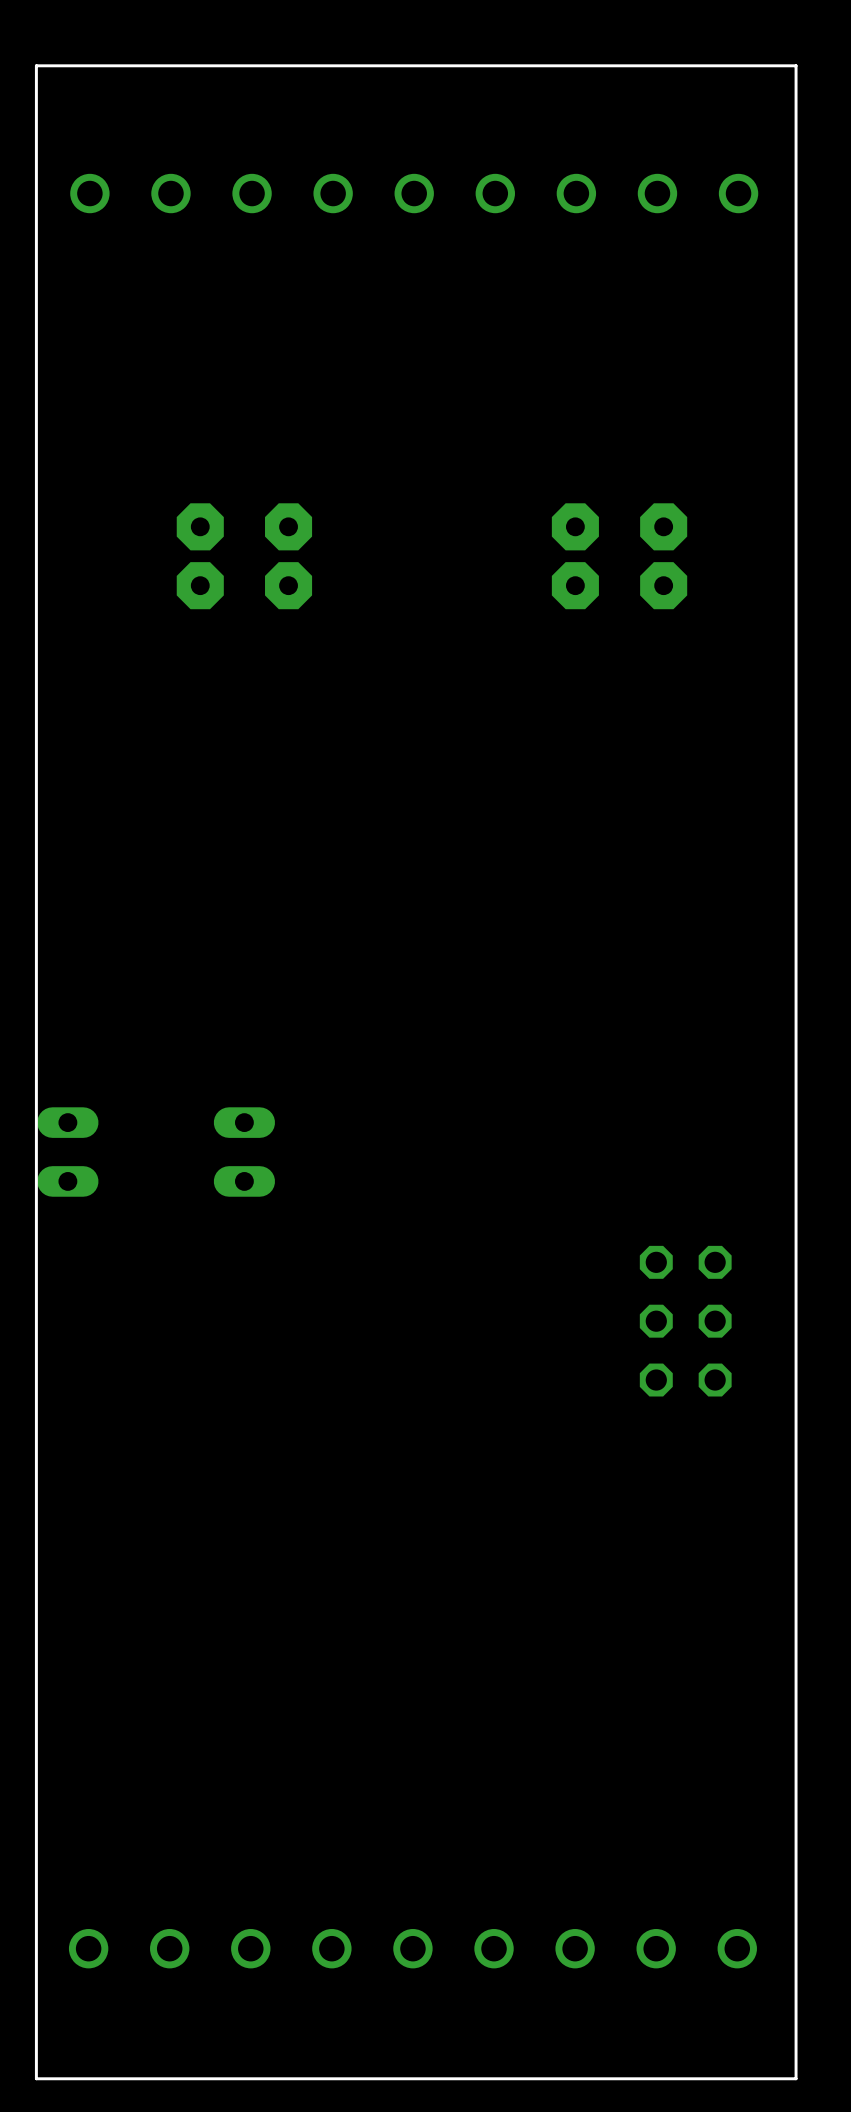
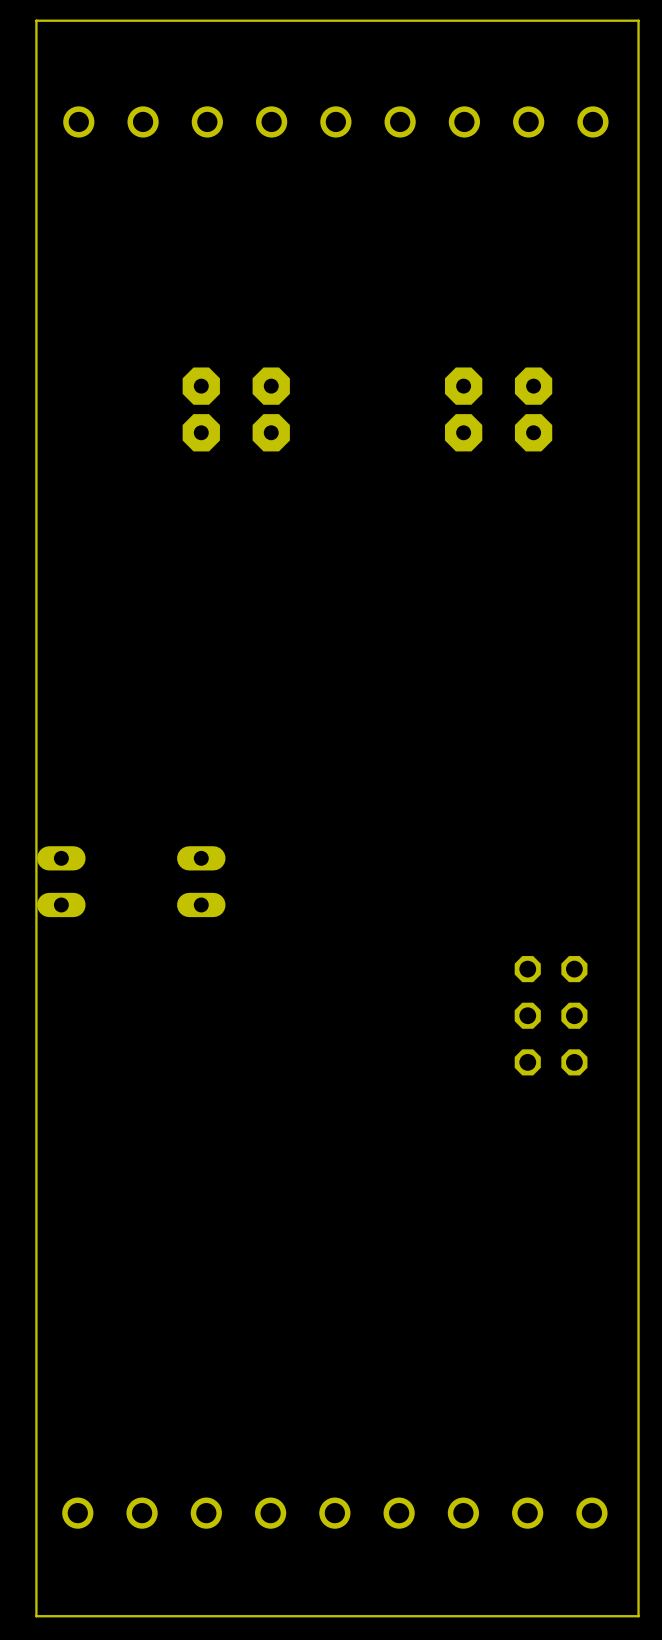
part: (200, 556) -> none
part: none -> (201, 409)
part: (288, 556) -> none
part: none -> (271, 409)

